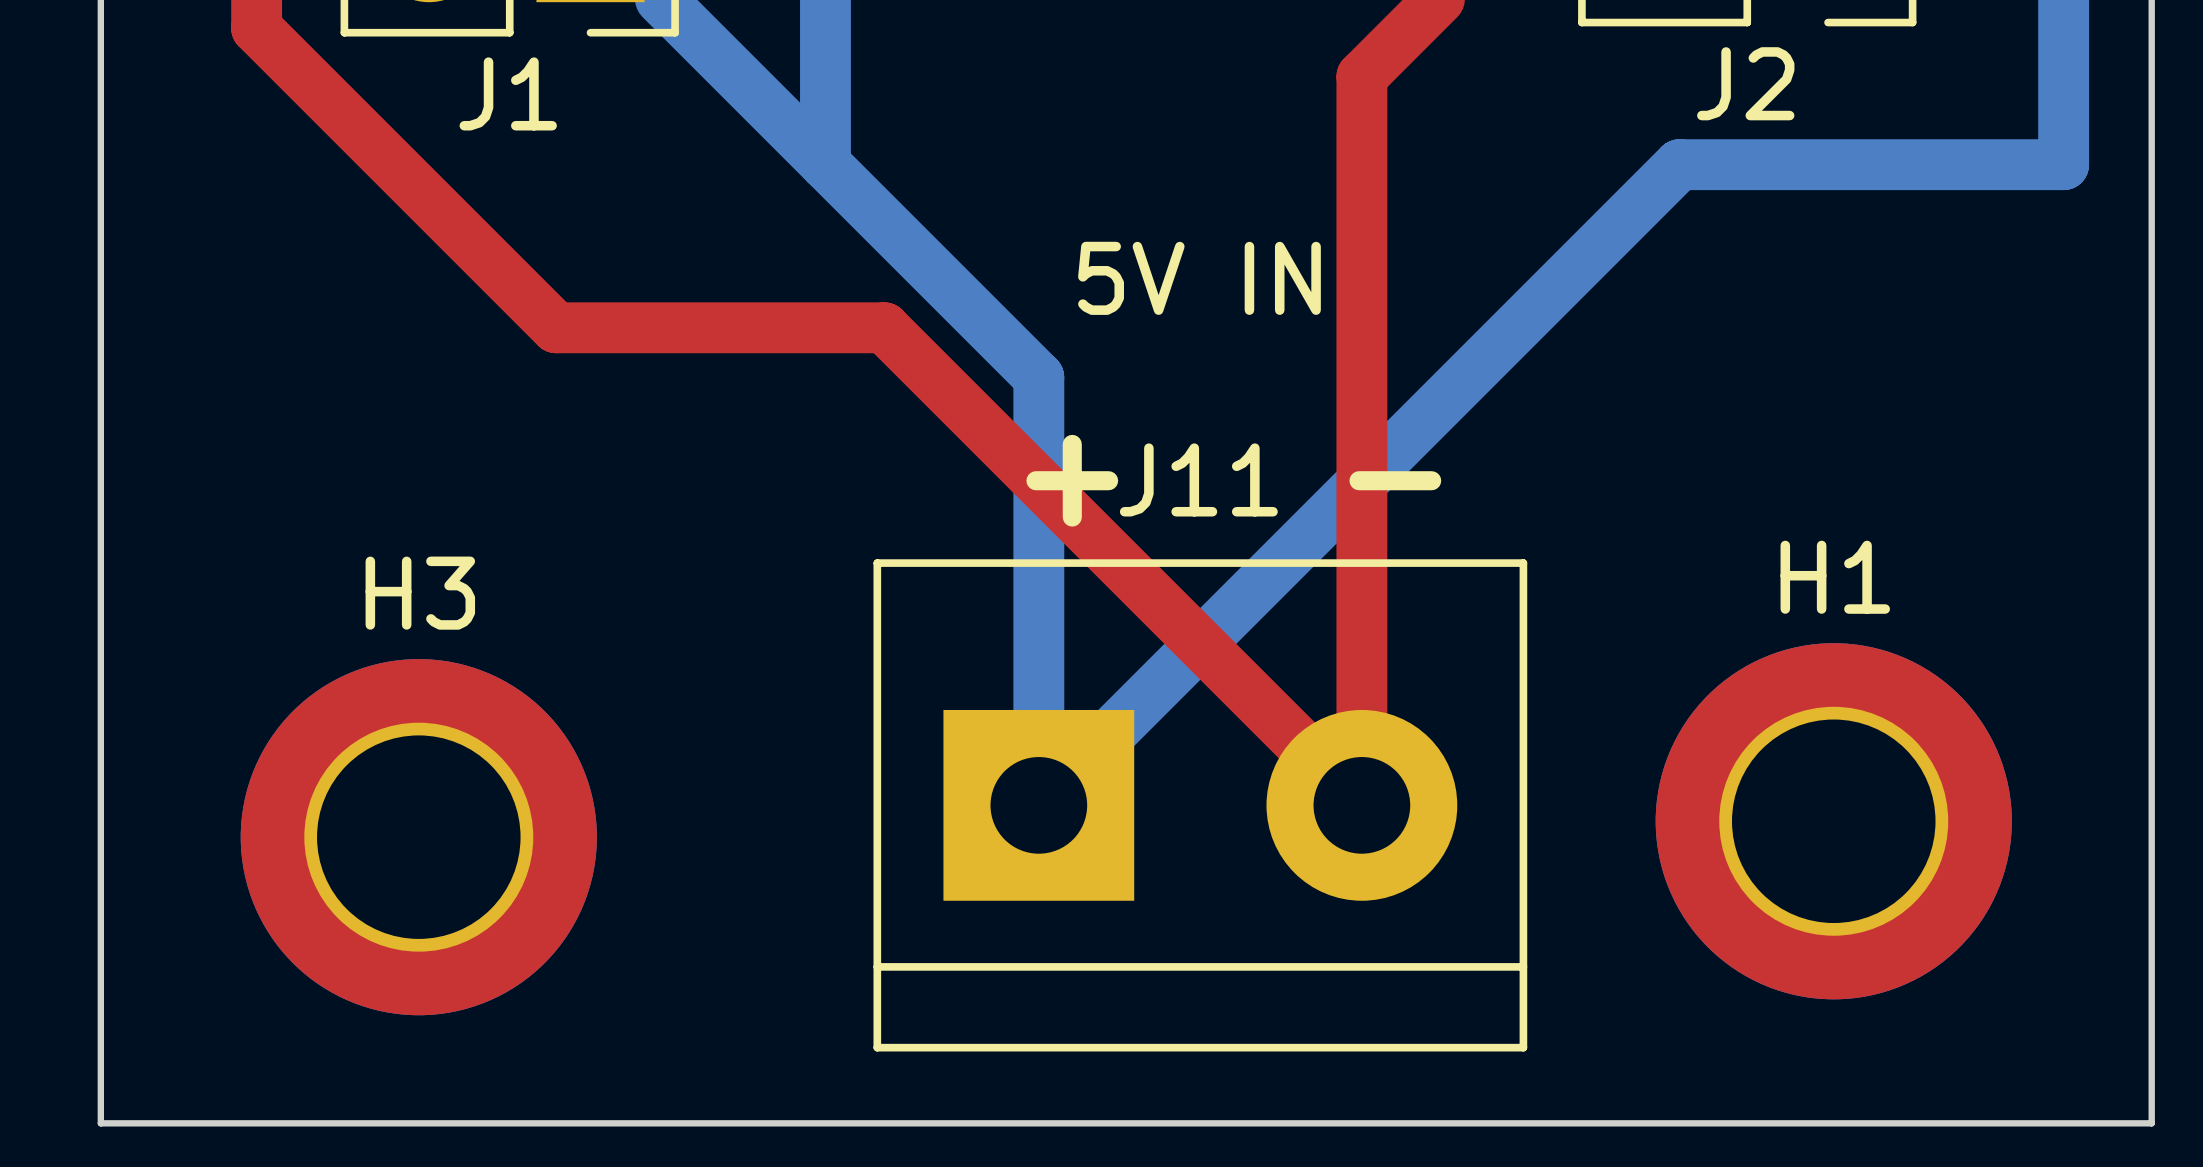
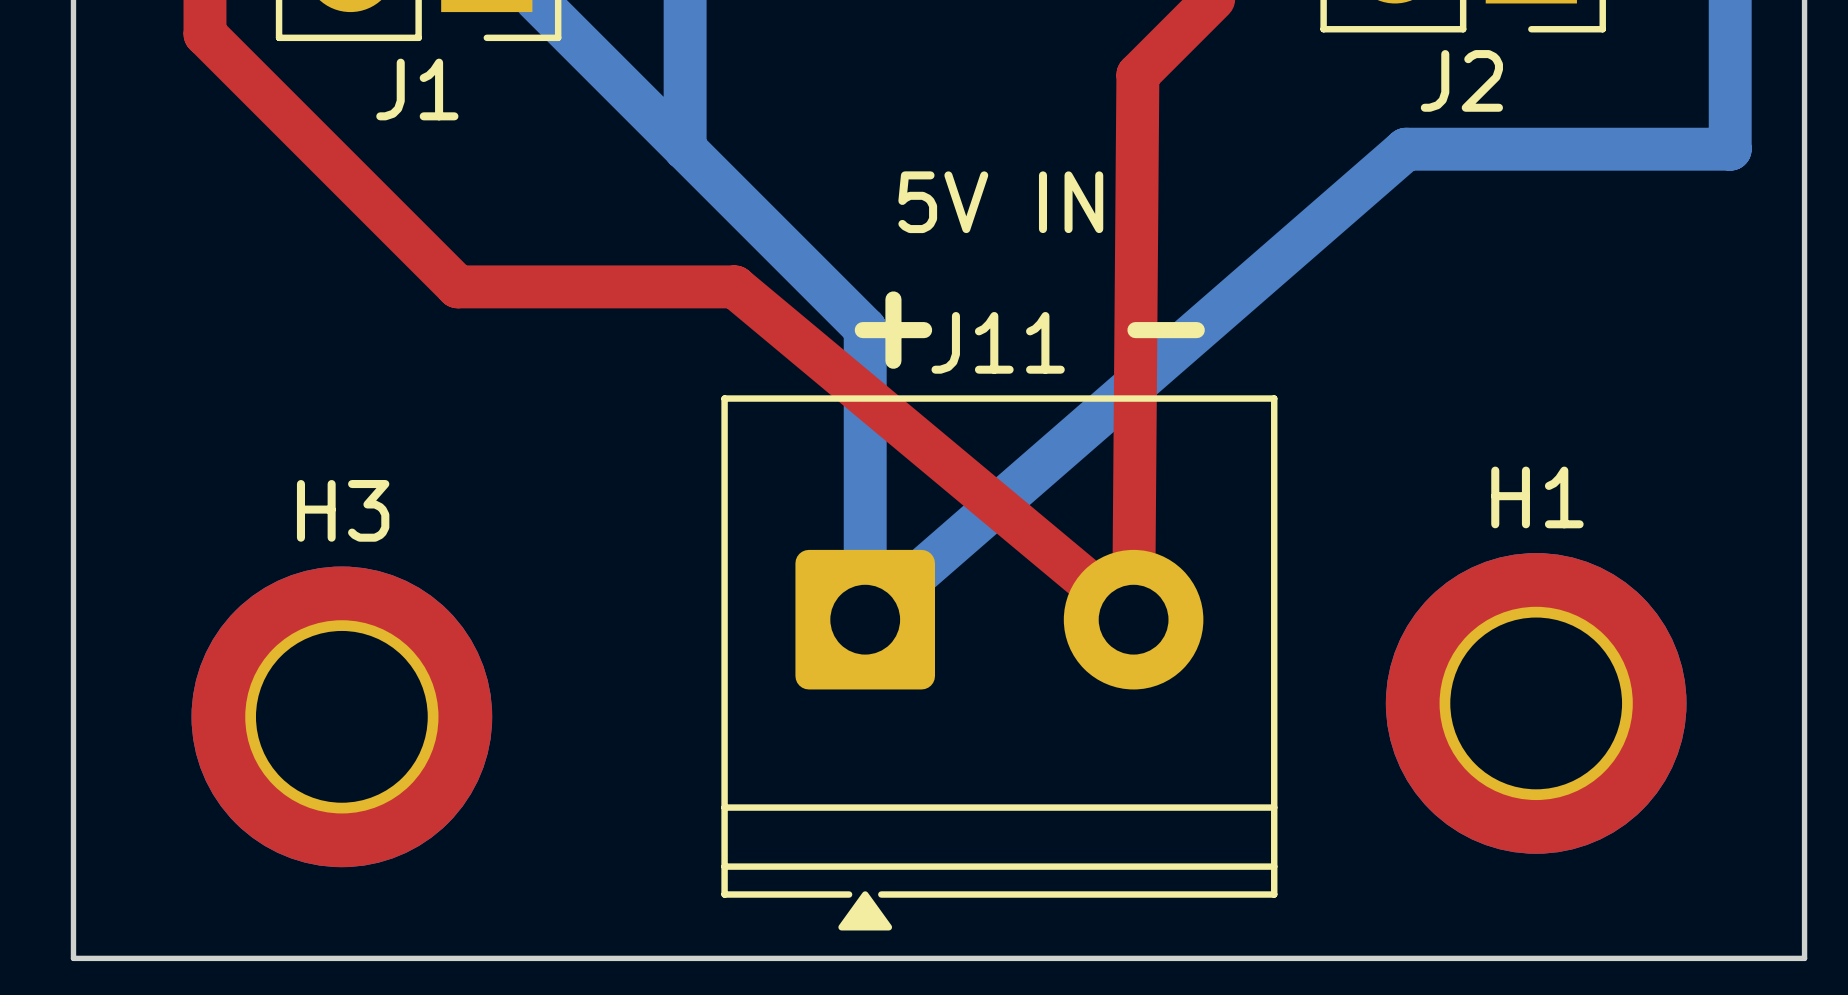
top track: (1361, 76) (1361, 805) (884, 327) -> (1137, 74) (1133, 619) (734, 286)
bottom track: (1679, 164) (1038, 805) (1038, 722) -> (1406, 149) (865, 619)
text position: 5V IN (1199, 278) -> 5V IN (1000, 202)
text position: + (1072, 480) -> + (893, 330)
text position: - (1395, 480) -> - (1166, 330)
J11 footprint: [873, 559, 1528, 1052] -> [721, 395, 1278, 931]

